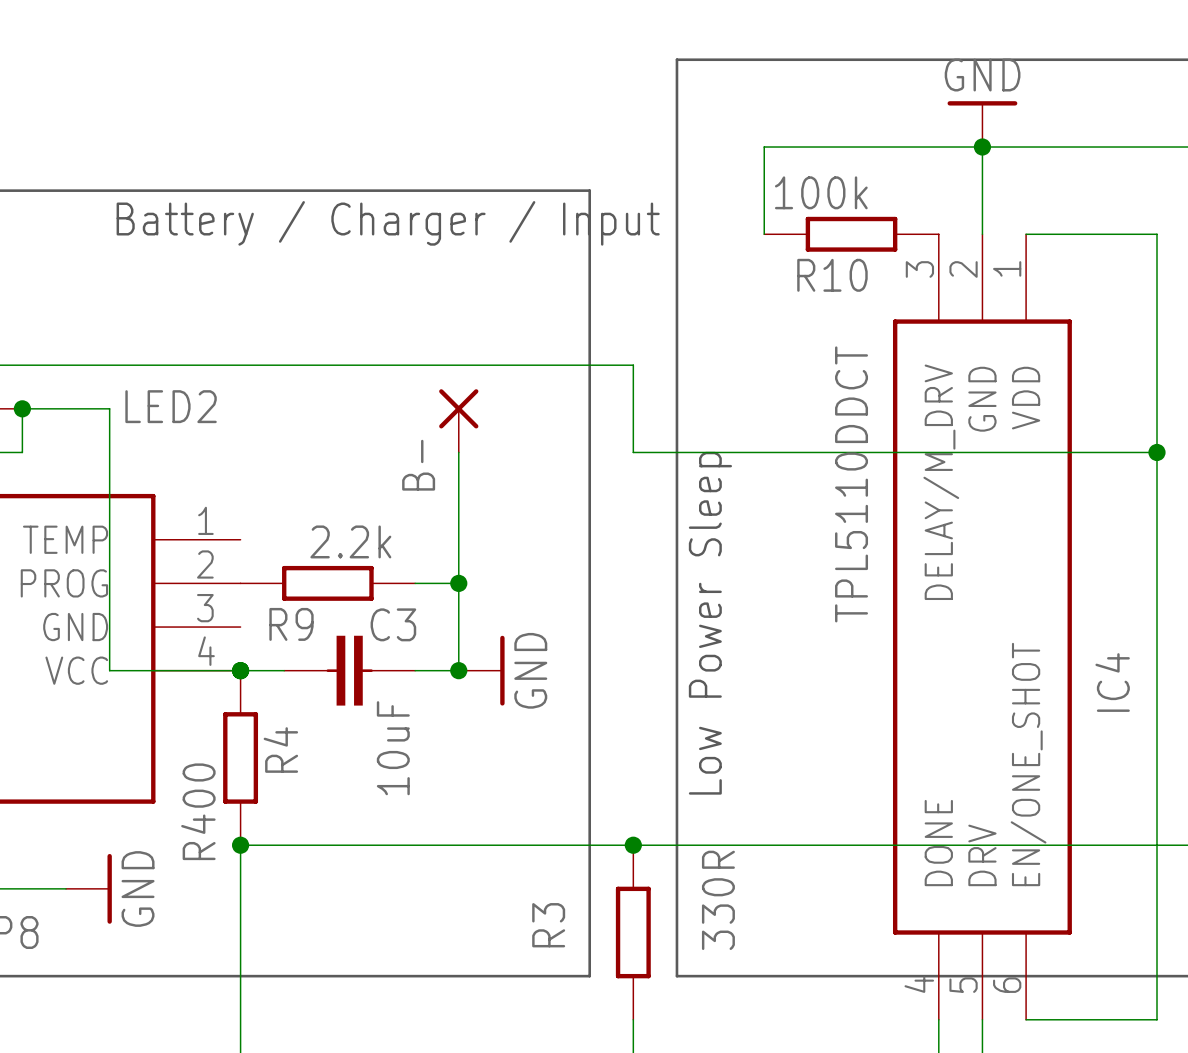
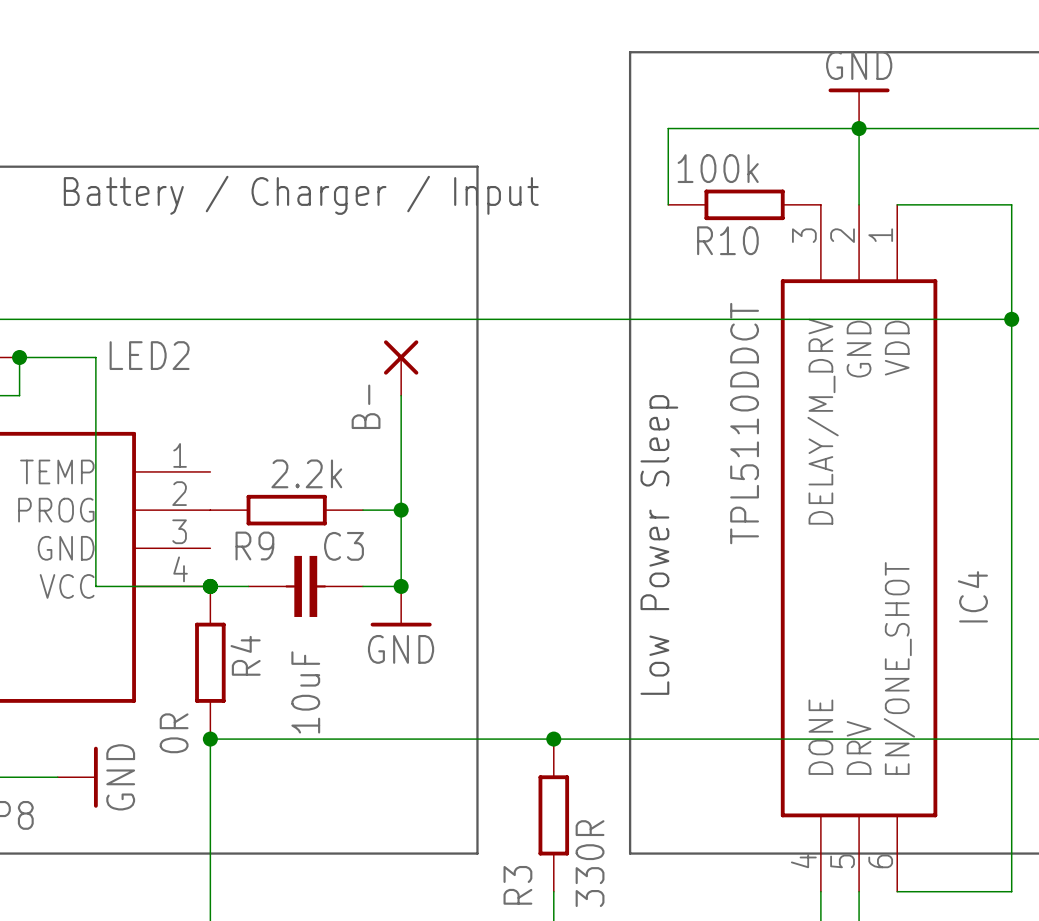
line: (720, 59) (676, 59) (676, 976) (720, 976) -> (630, 52) (630, 853)
line: (546, 190) (589, 190) (589, 976) (546, 976) -> (477, 166) (477, 853)
text position: Battery / Charger / Input (388, 223) -> Battery / Charger / Input (301, 195)
wire: (633, 365) (633, 452) (1156, 452) -> (553, 319) (1011, 319)
junction position: (1156, 452) -> (1011, 319)
text position: Low Power Sleep (710, 623) -> Low Power Sleep (659, 544)
power symbol rotation: 0° (502, 670) -> 90° clockwise (401, 624)
C3 value position: 10uF (393, 748) -> 10uF (305, 692)
R4 value: R400 (198, 811) -> 0R (174, 733)
R3 value position: 330R (718, 900) -> 330R (590, 863)
R3 name position: R3 (548, 925) -> R3 (517, 885)

